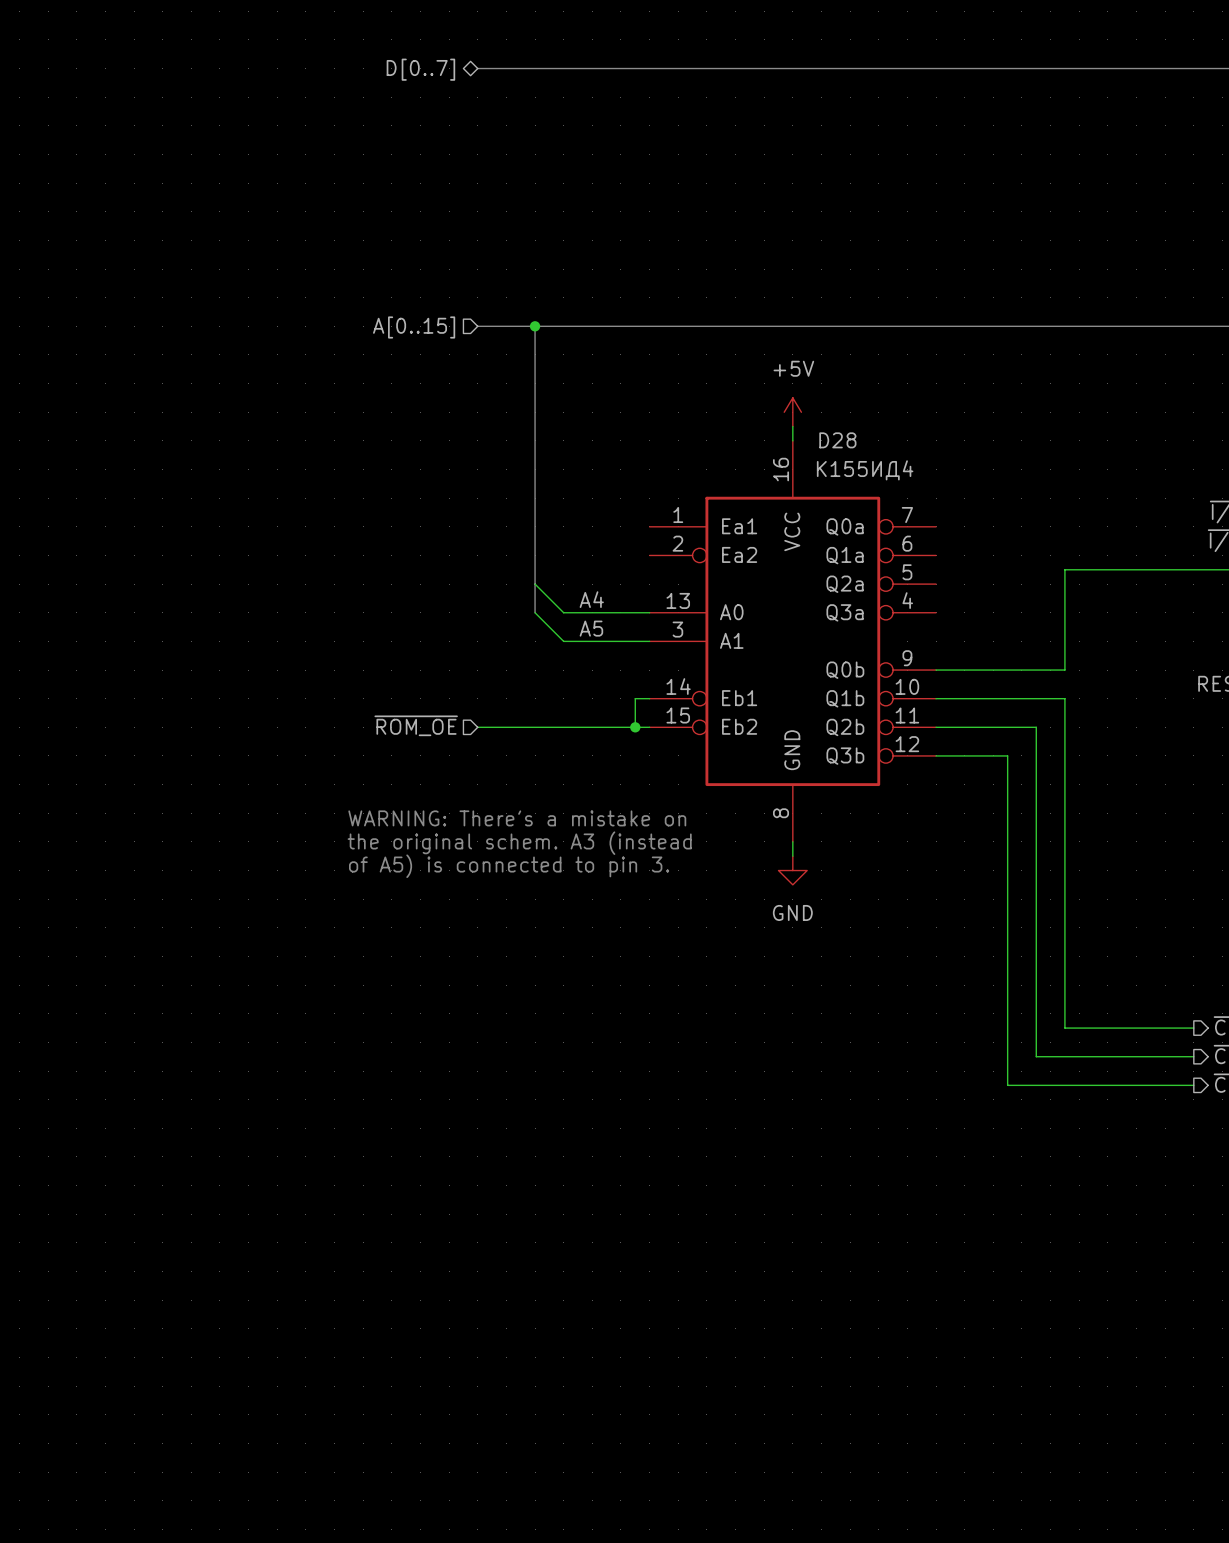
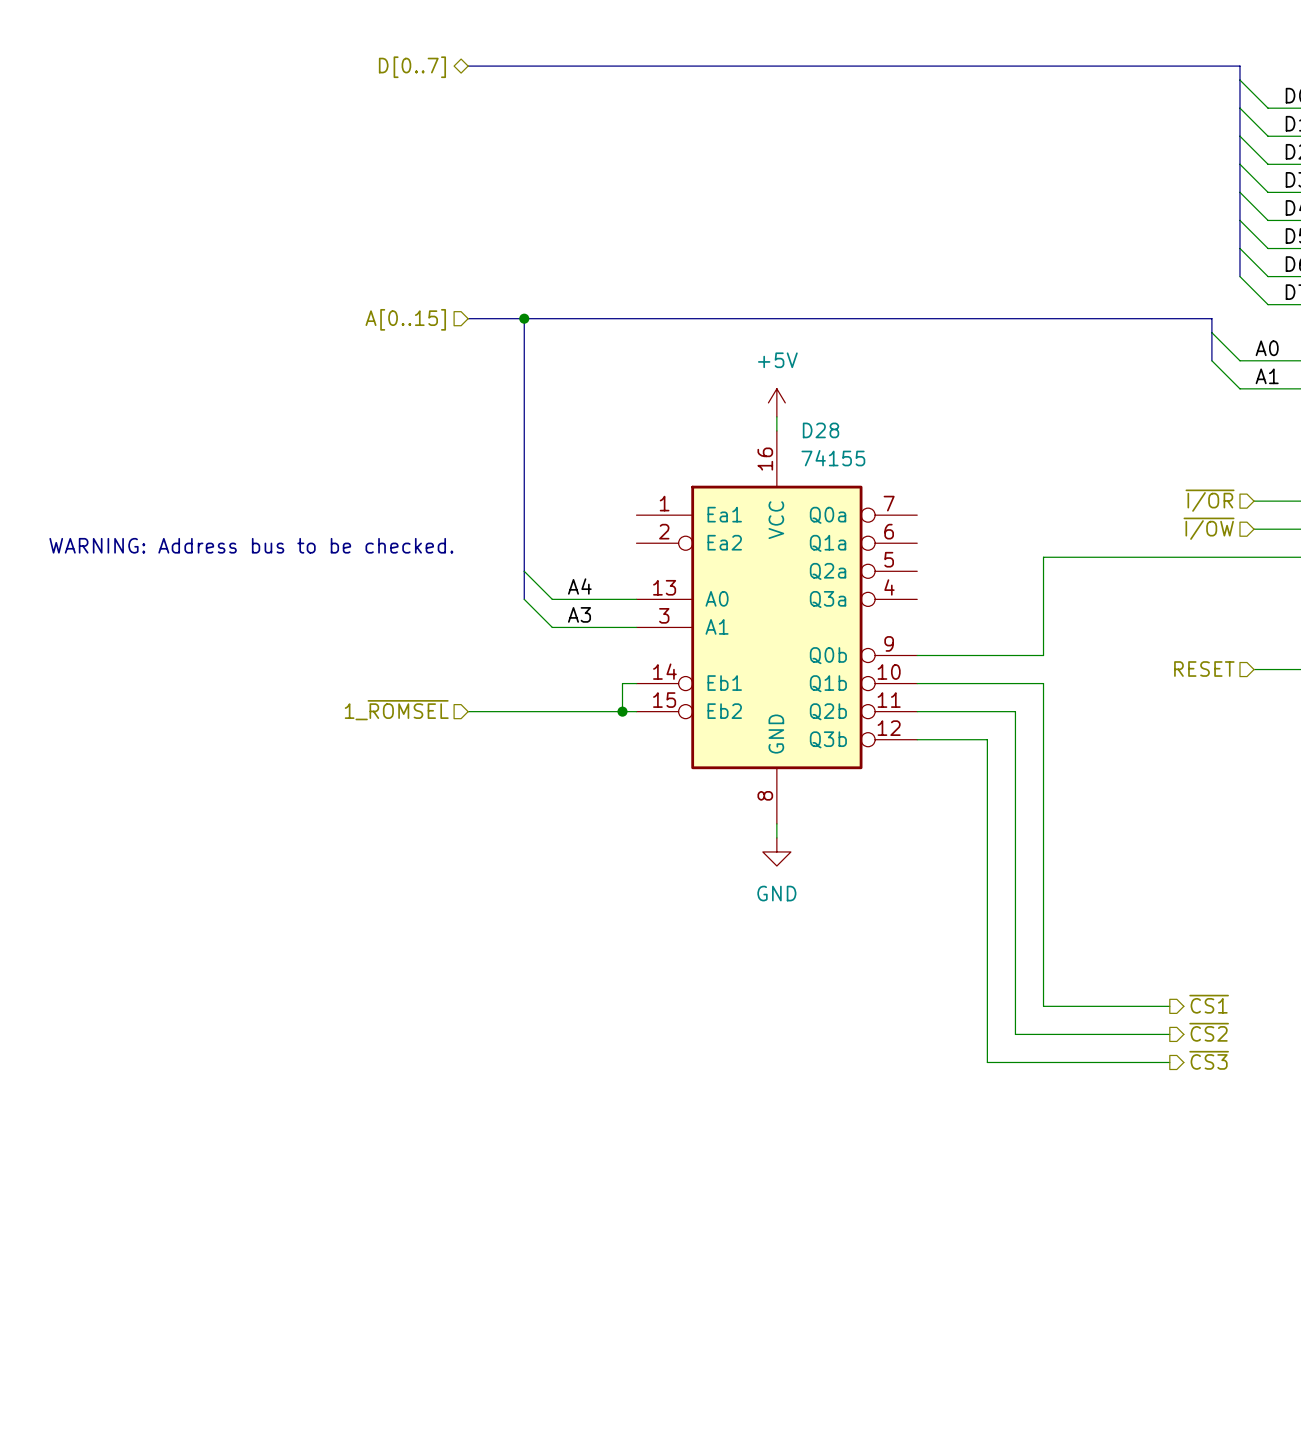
D28 value: none -> 74155 (833, 458)
D28 text: К155ИД4 (865, 470) -> none
text: none -> WARNING: Address bus to be checked. (251, 545)
label: A5 (591, 628) -> A3 (579, 614)
hierarchical label: ~{ROM_OE} (416, 725) -> 1_~{ROMSEL} (396, 710)
text: WARNING: There's a mistake on (517, 818) -> none
text: the original schem. A3 (instead (519, 843) -> none
text: of A5) is connected to pin 3. (509, 866) -> none

